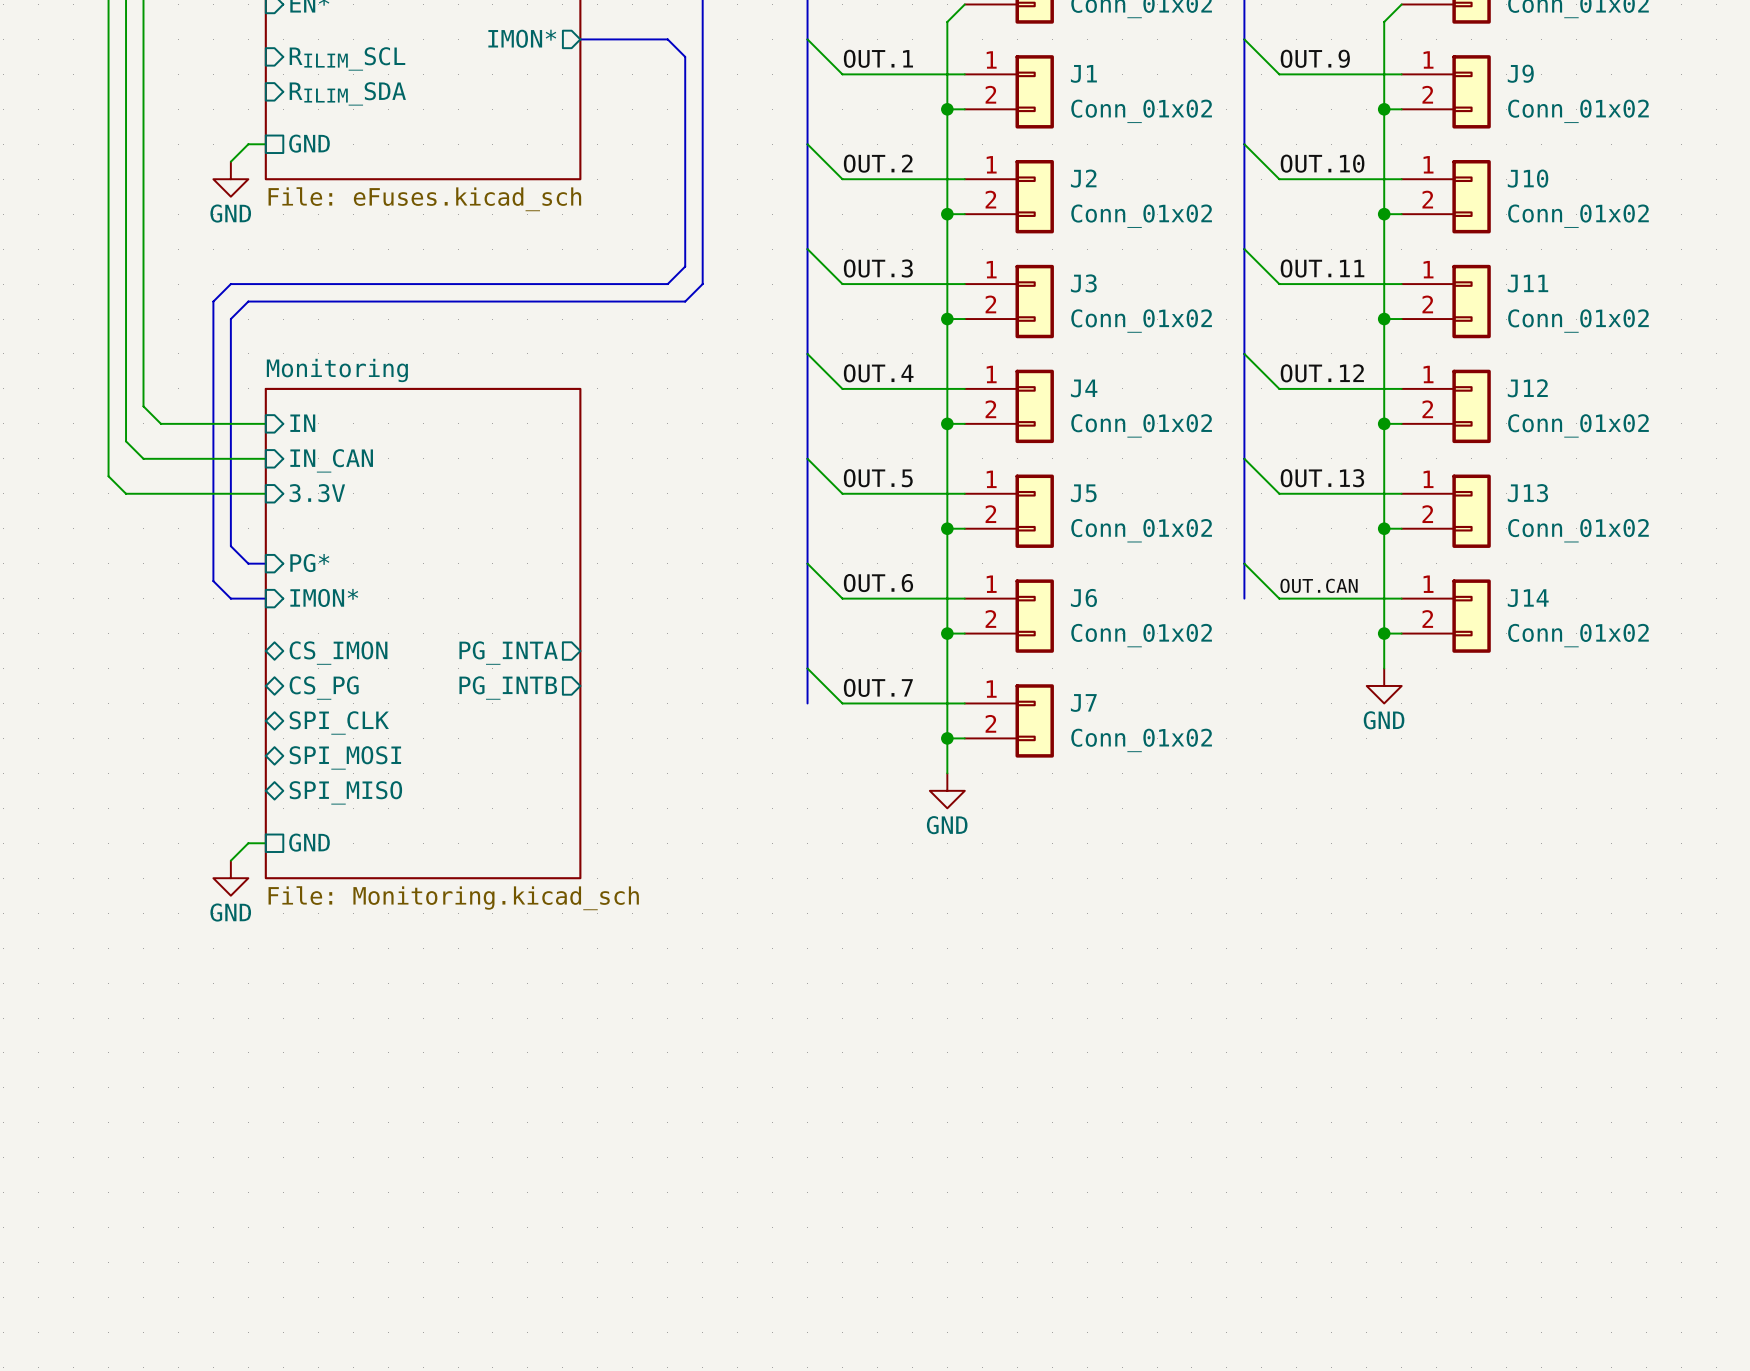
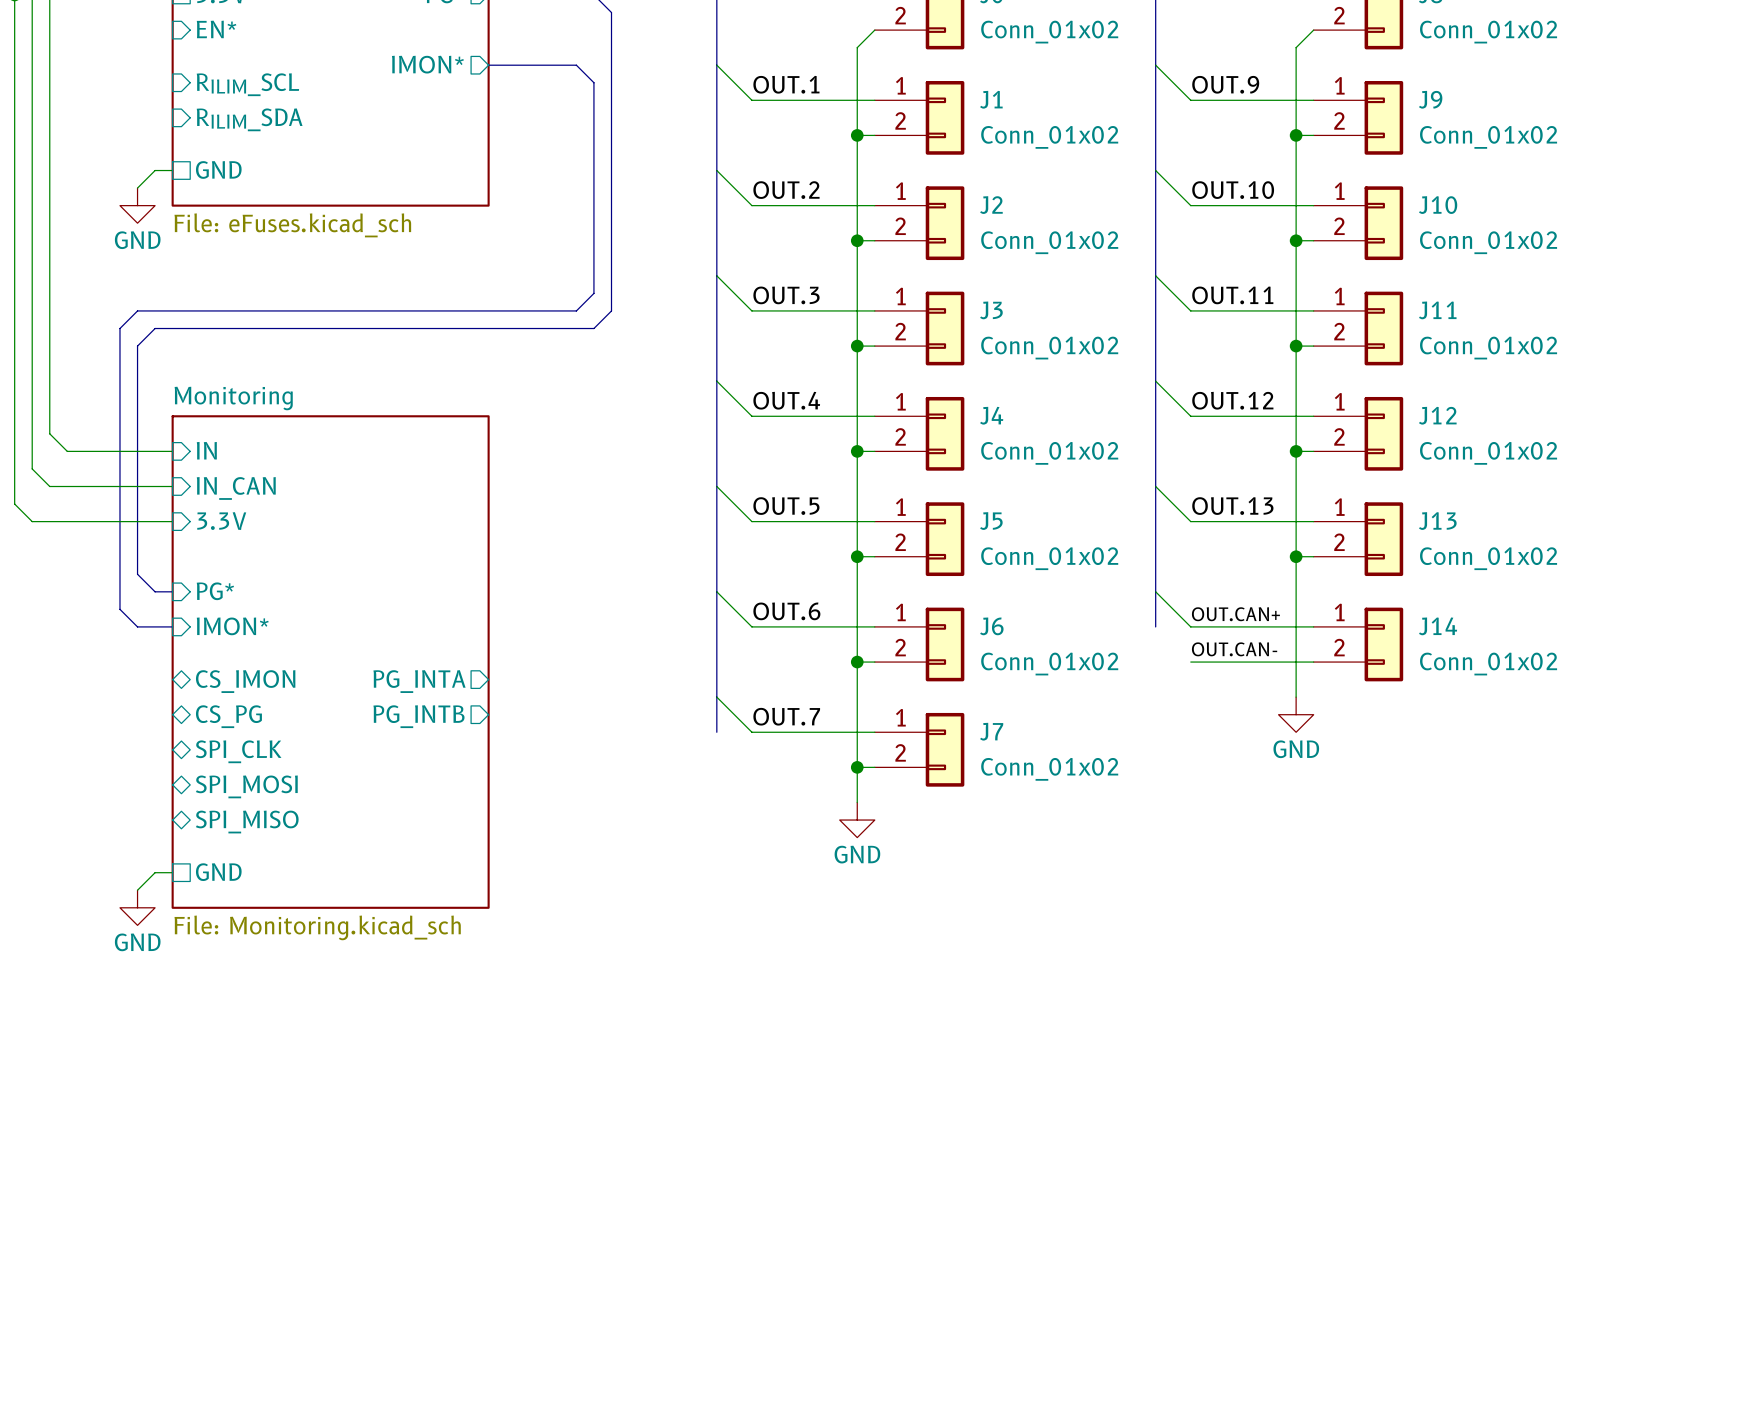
label: OUT.CAN (1319, 585) -> OUT.CAN+ (1235, 614)
label: none -> OUT.CAN- (1234, 649)
wire: none -> (1190, 662) (1296, 662)
junction: (1384, 633) -> none

